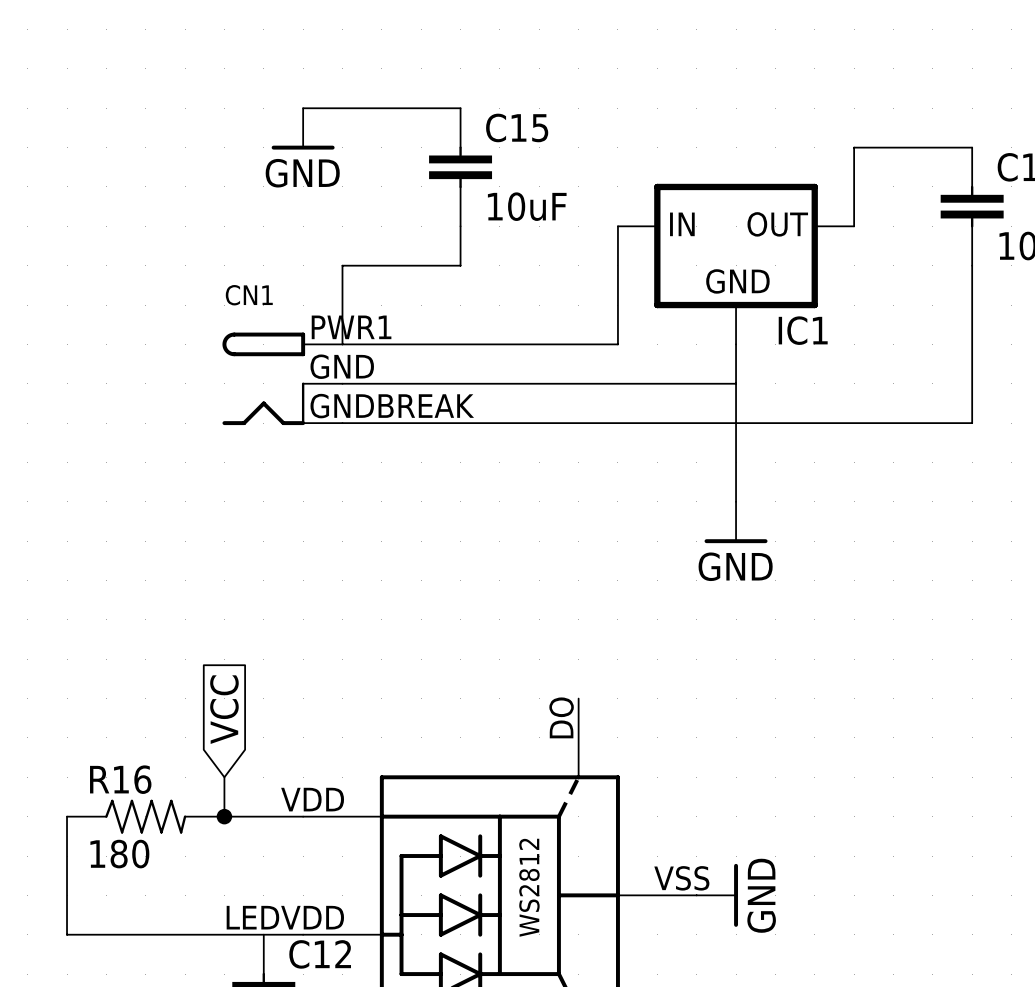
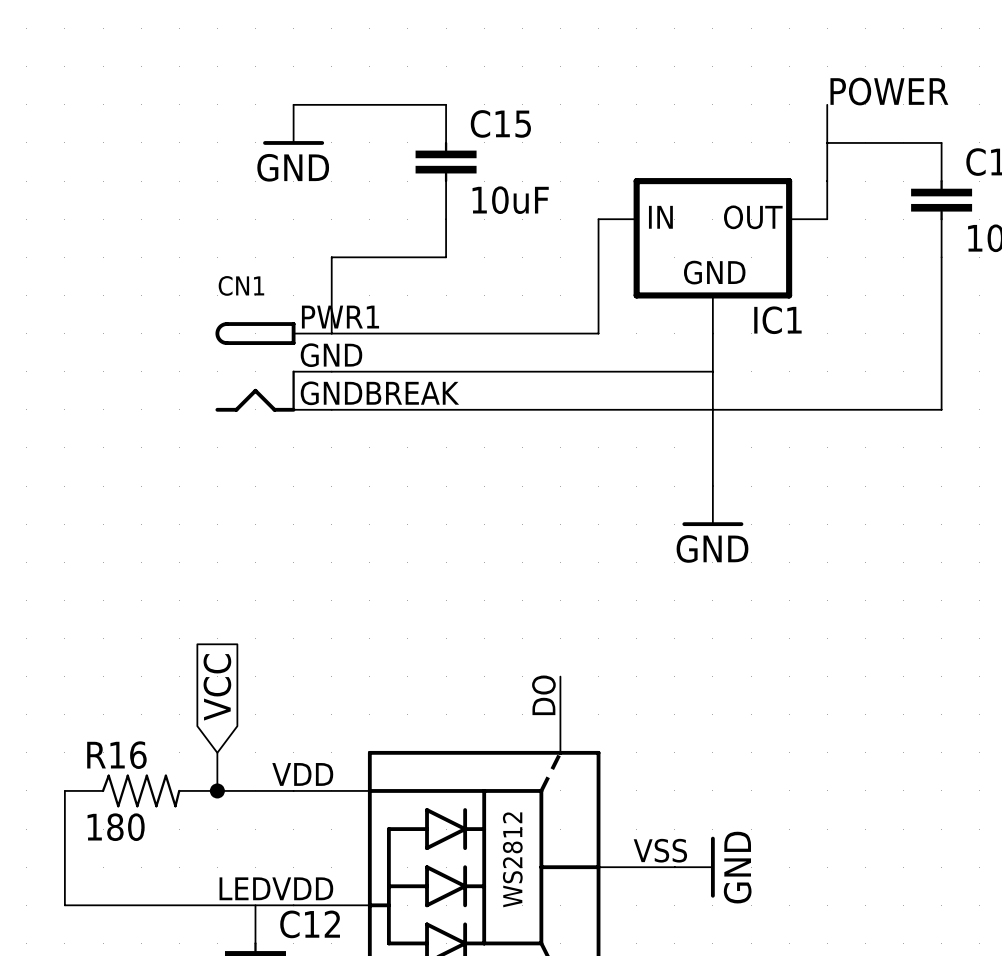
label: none -> POWER (889, 91)
wire: none -> (827, 104) (827, 142)

